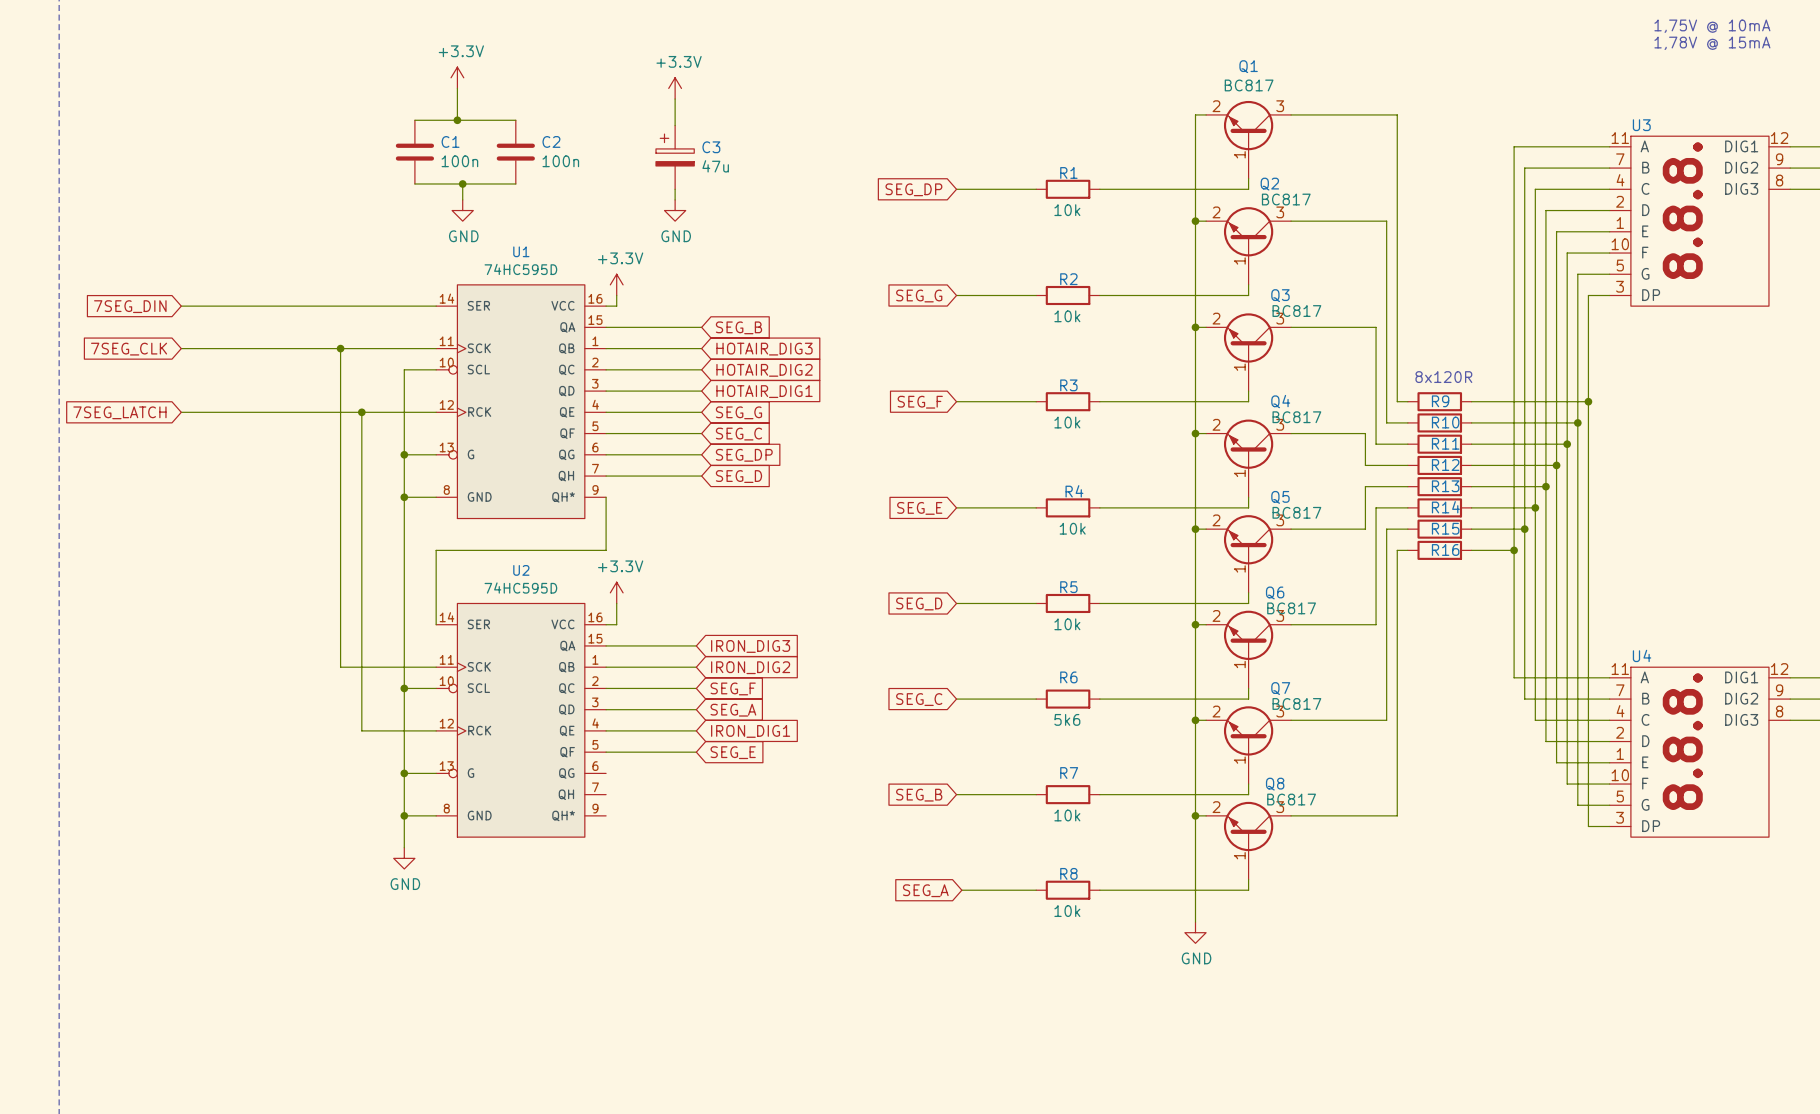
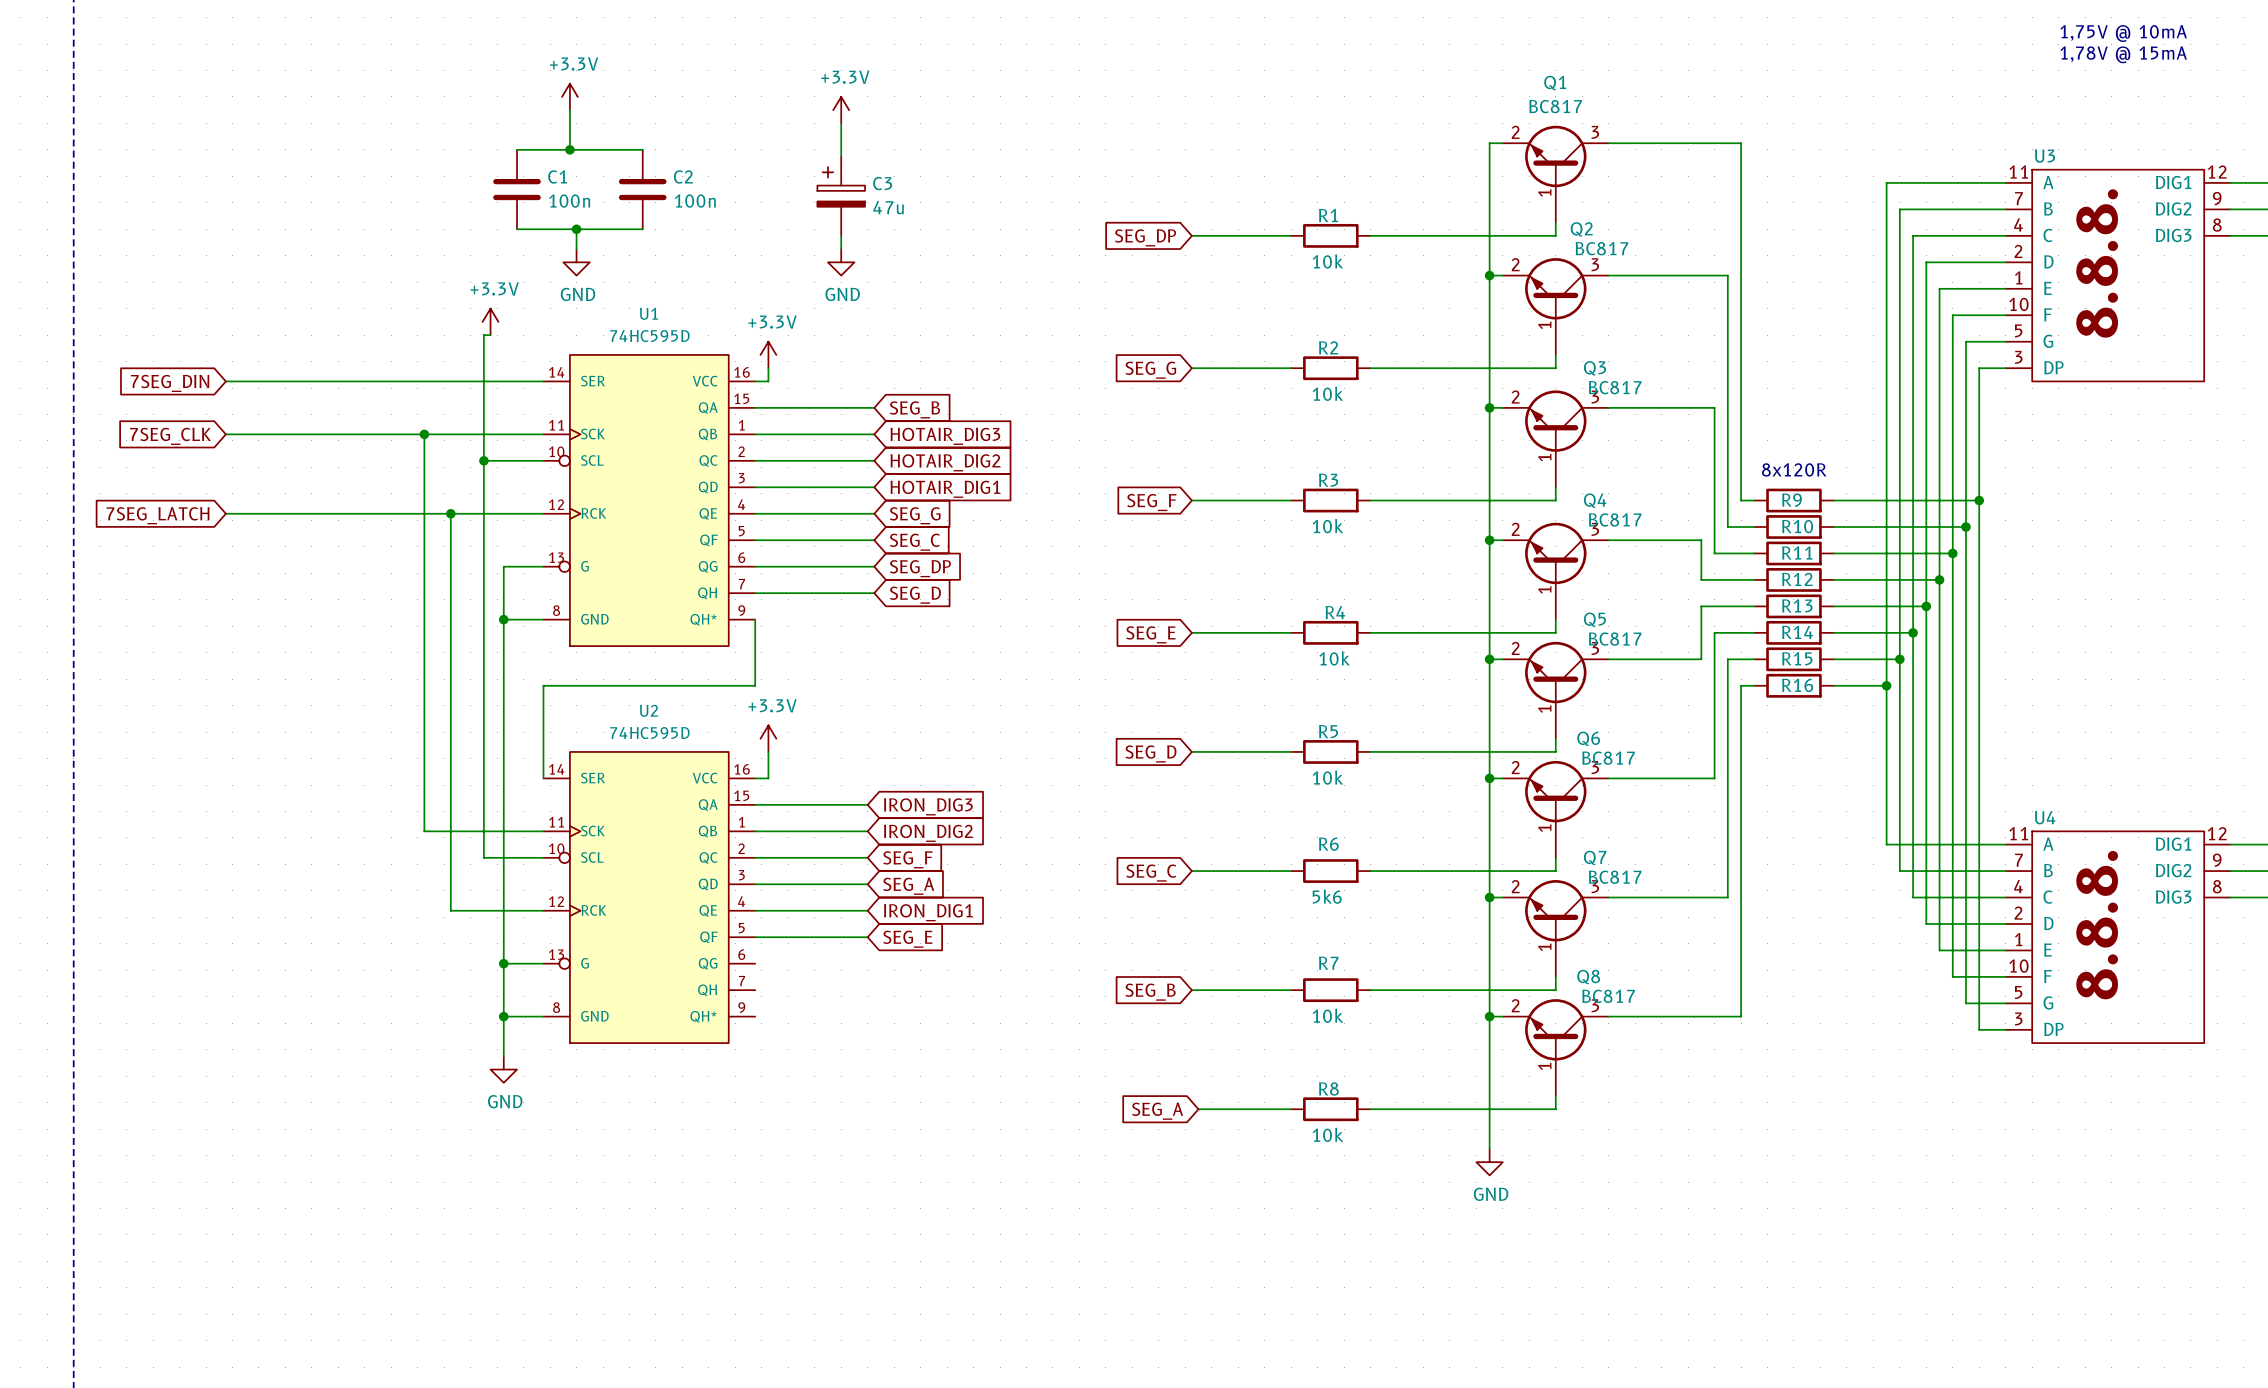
power symbol: none -> +3.3V (490, 321)
wire: none -> (490, 335) (483, 335) (483, 857) (503, 857)
junction: none -> (483, 460)
wire: (404, 369) (404, 454) -> (503, 460) (483, 460)
junction: (404, 454) -> none
junction: (404, 688) -> none

